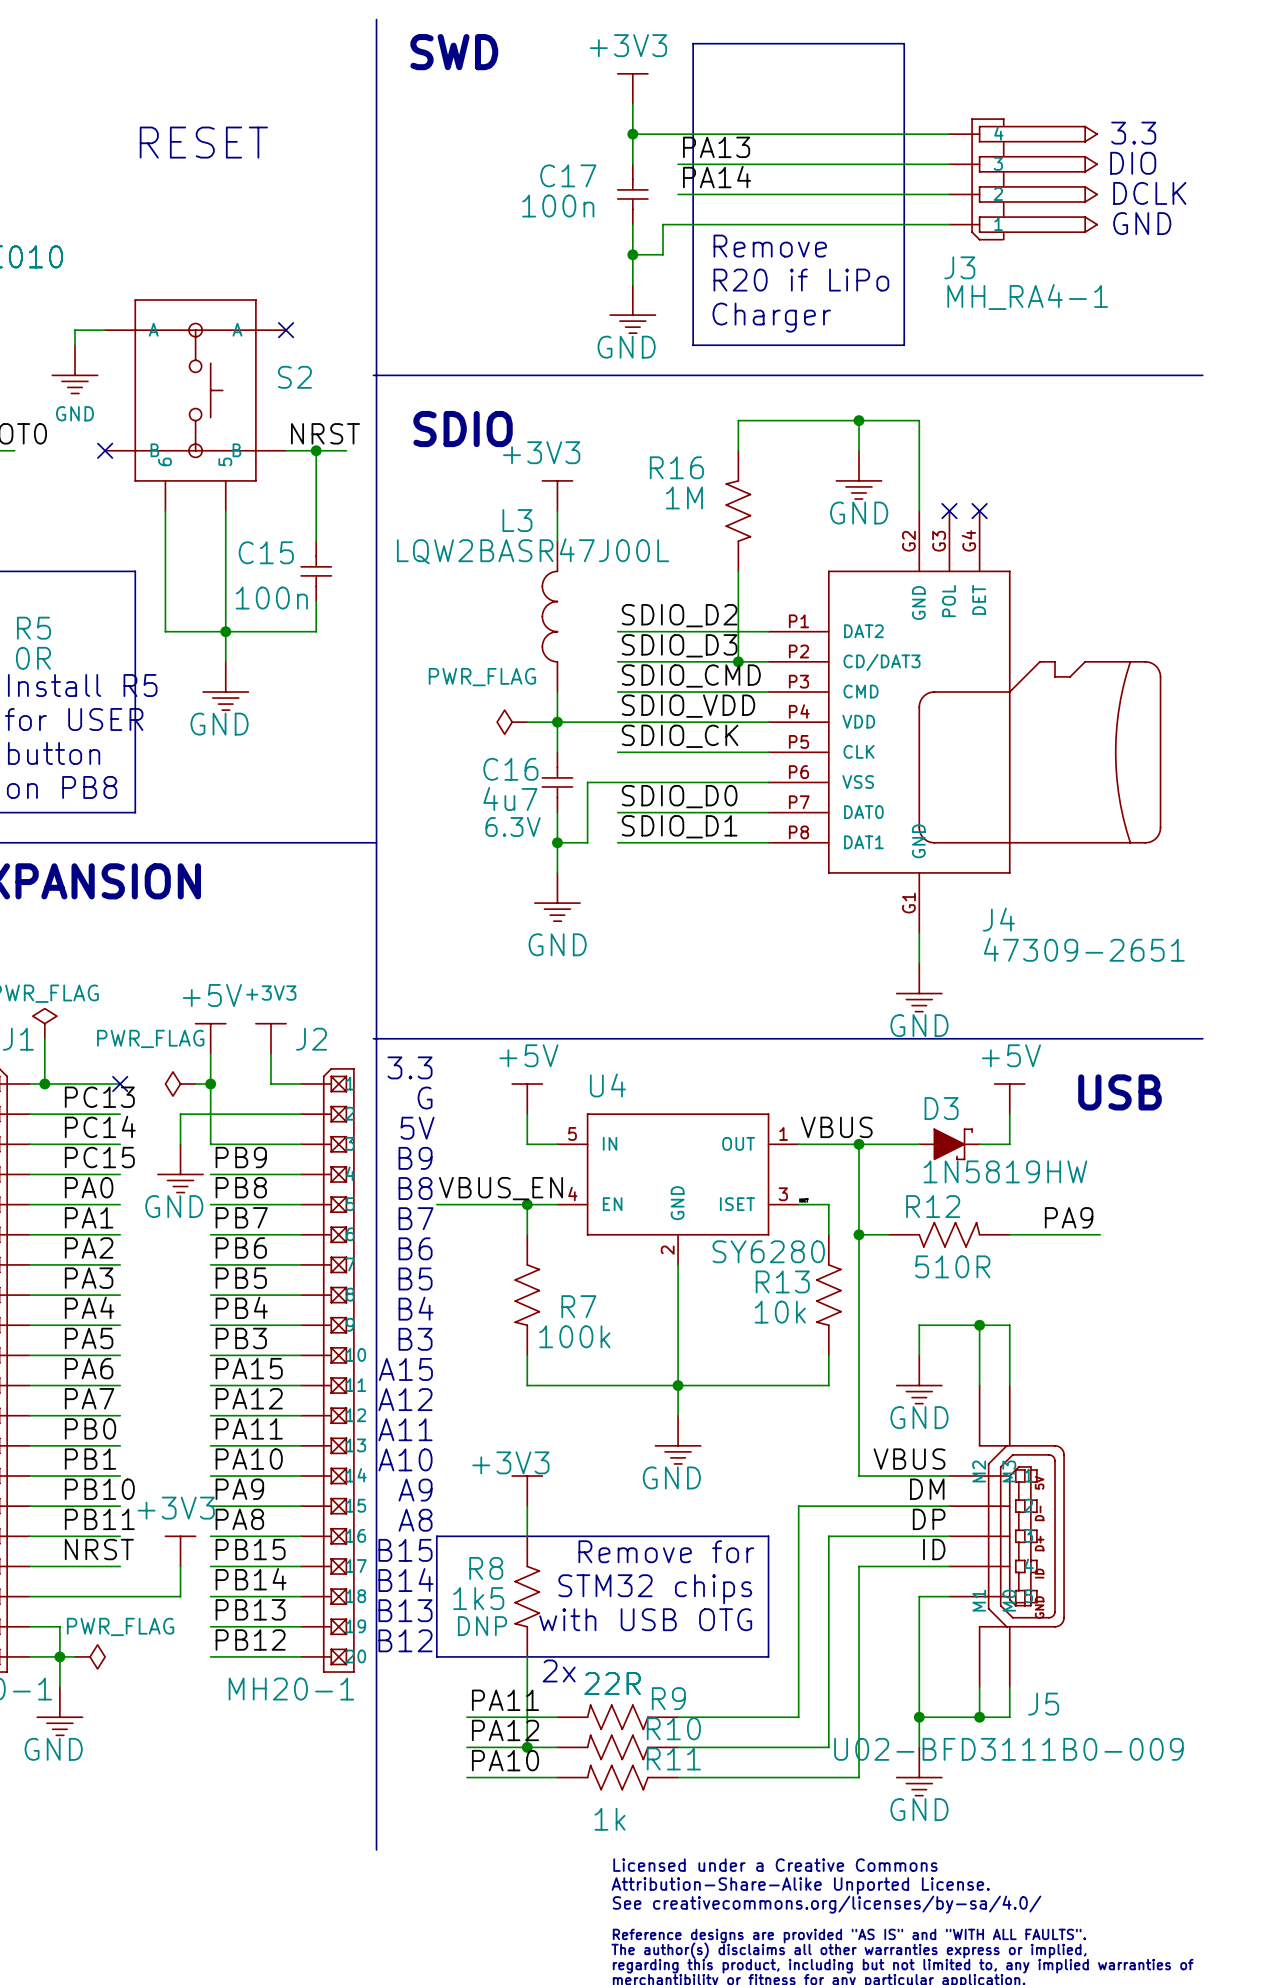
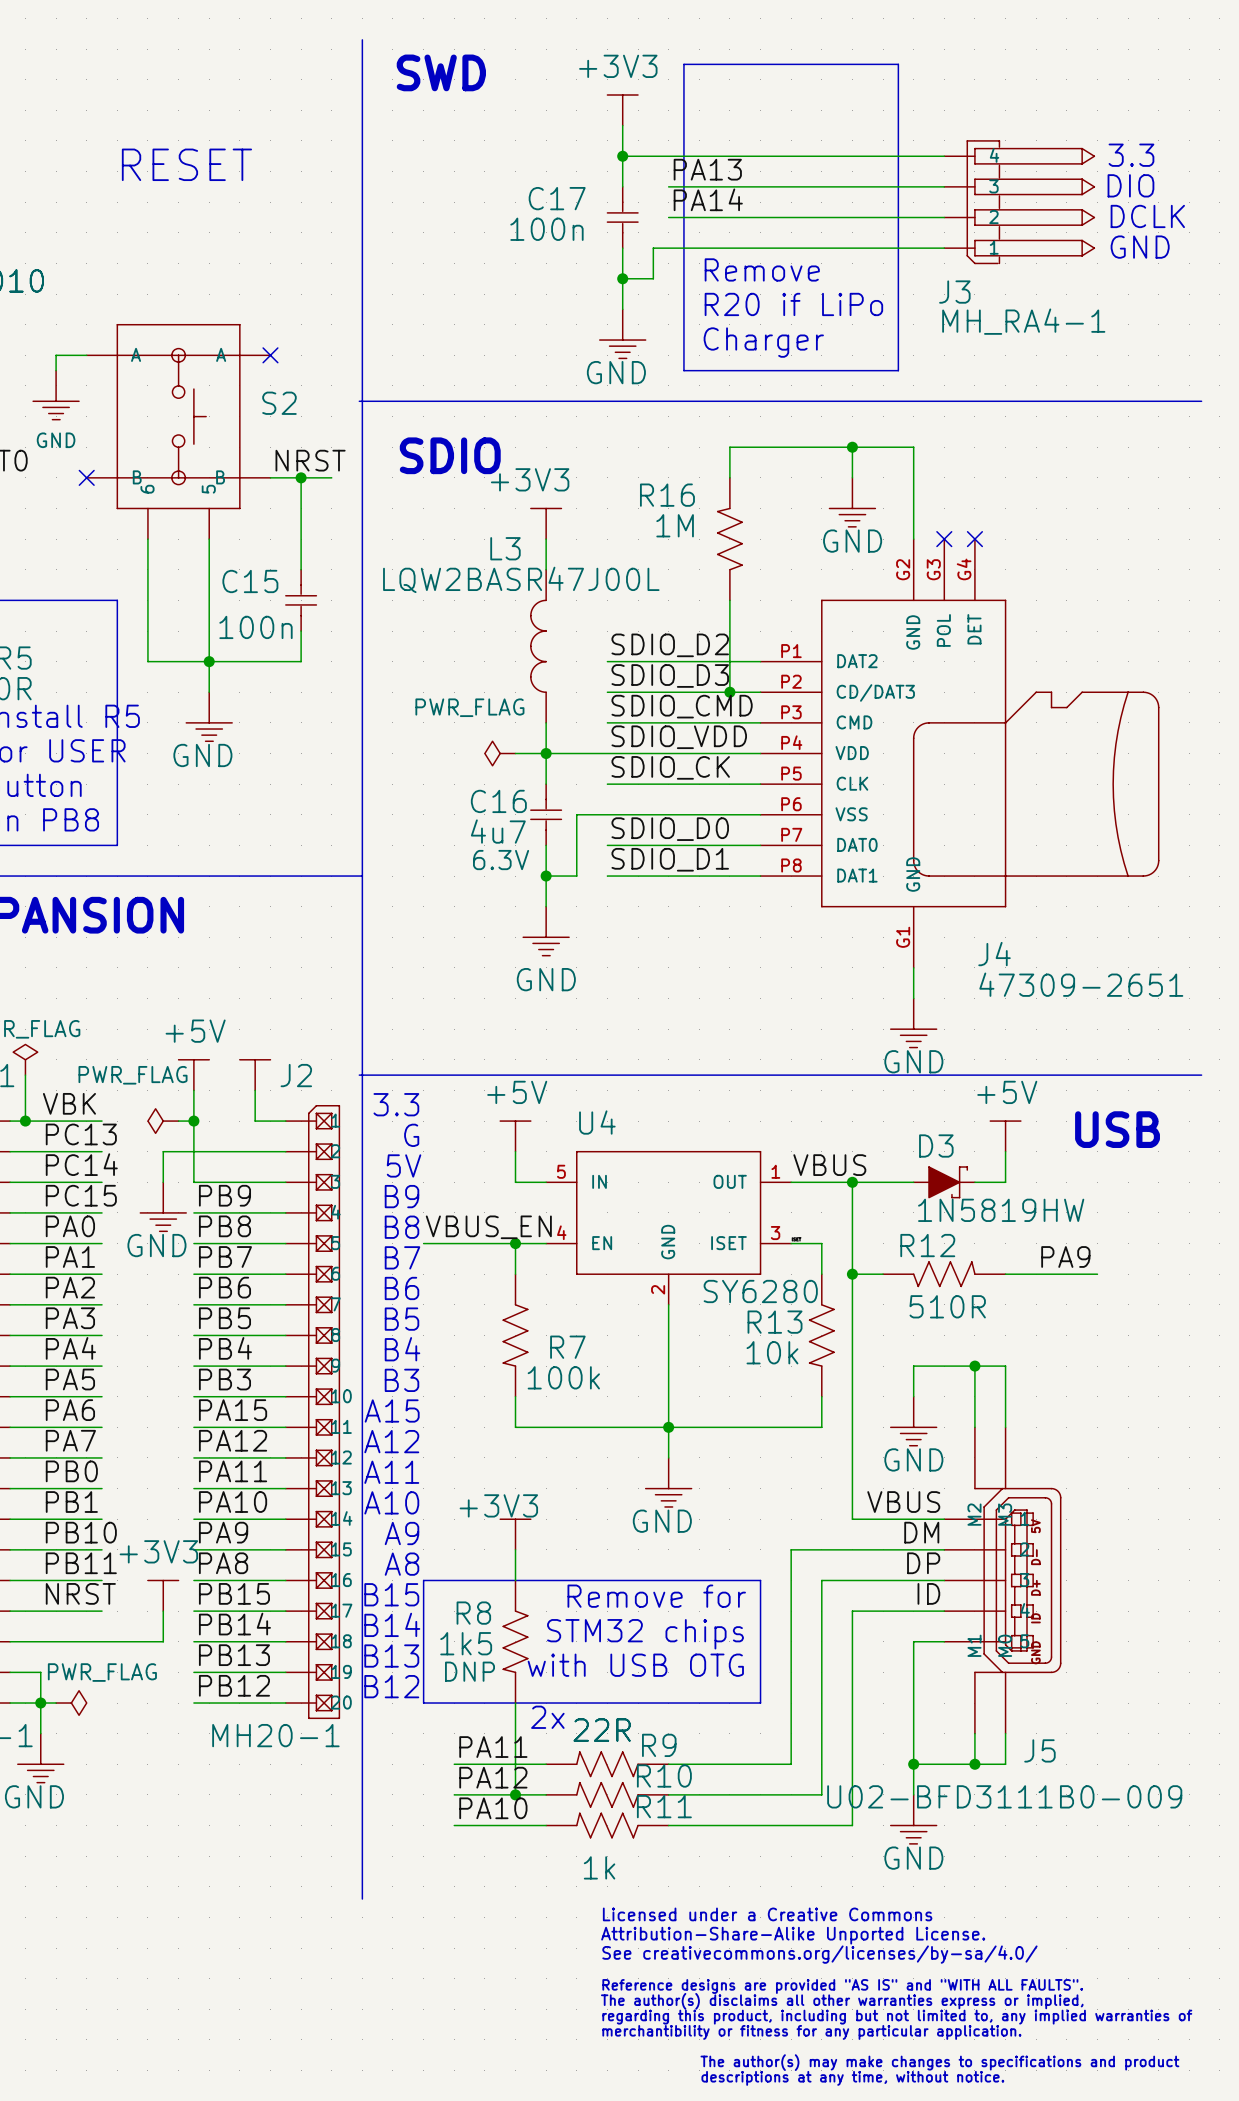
power symbol text: +3V3 (271, 993) -> none
label: none -> VBK (69, 1103)
no-connect mark: (120, 1084) -> none

